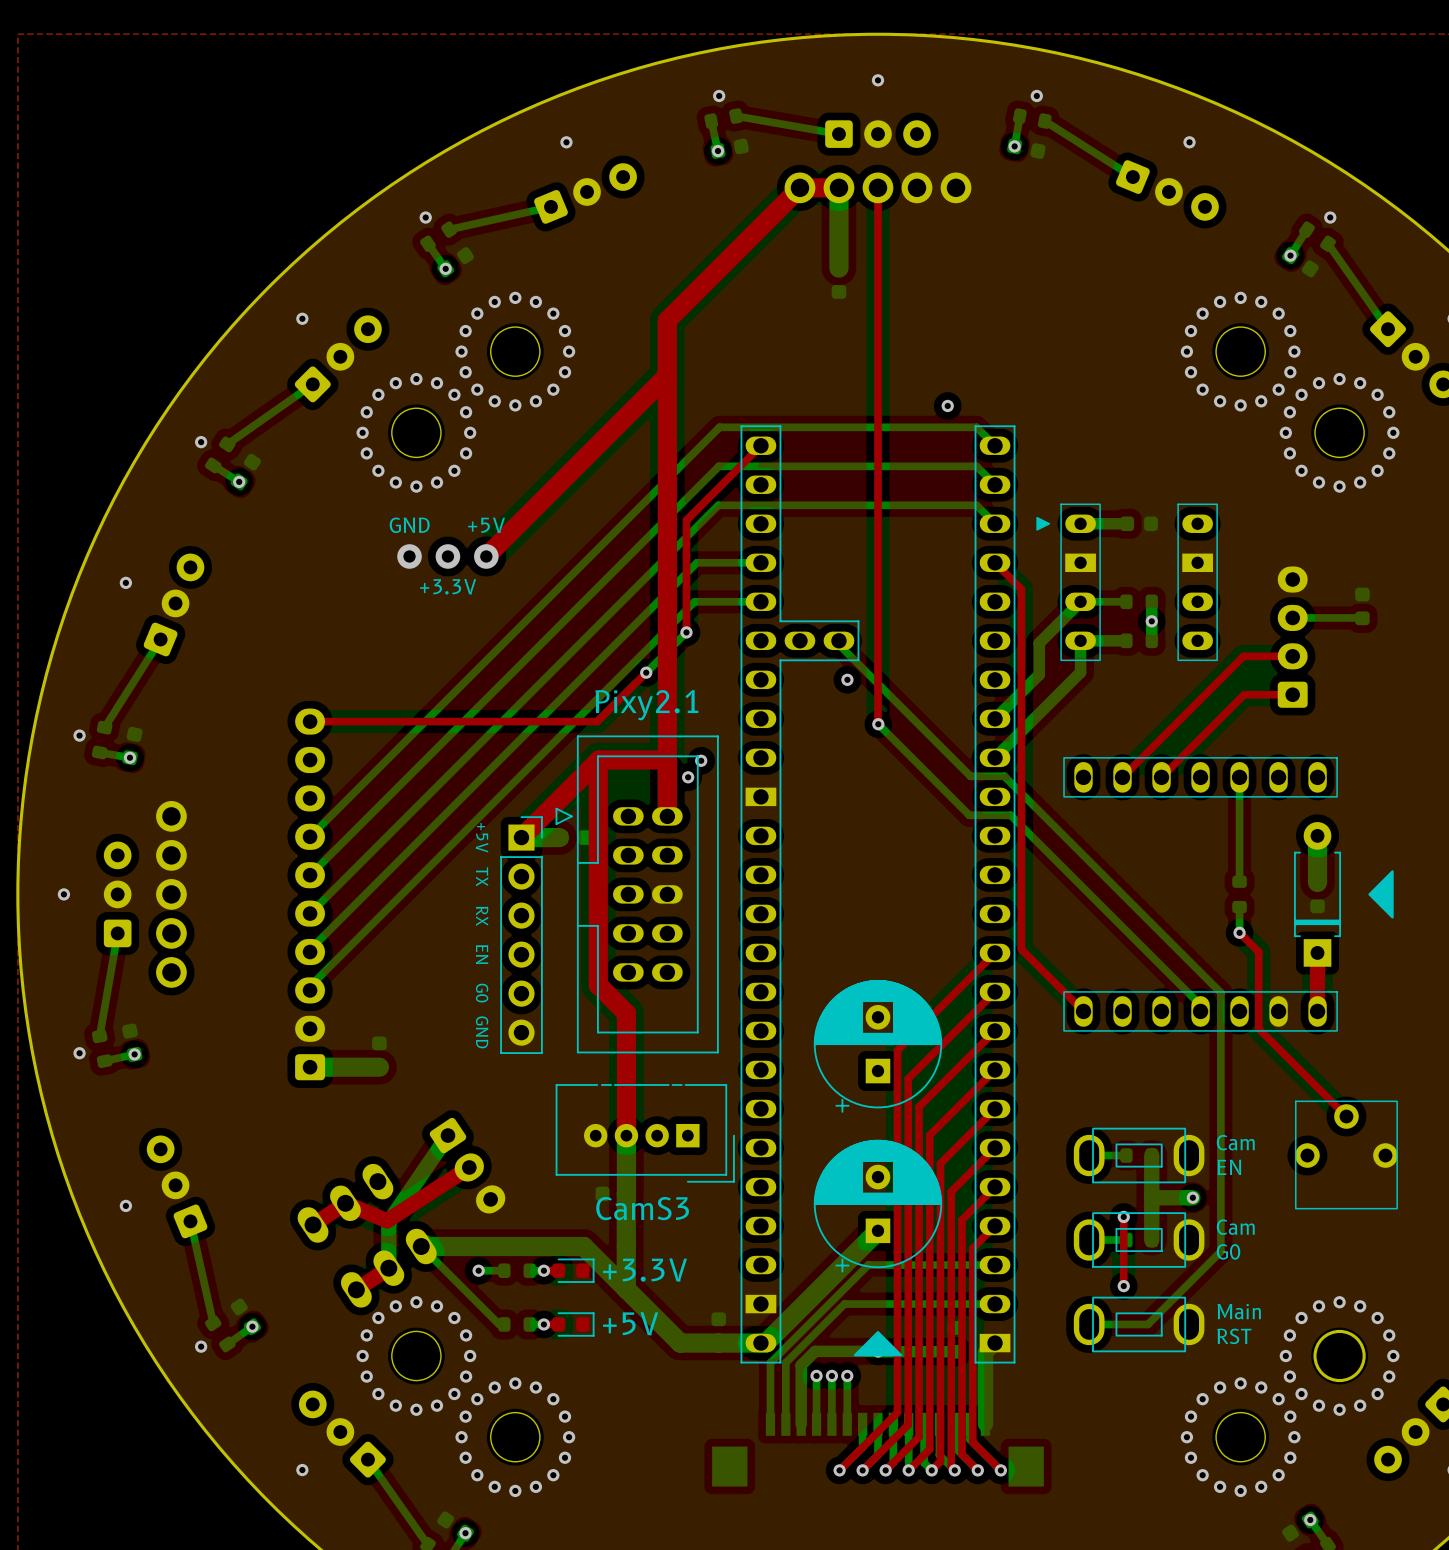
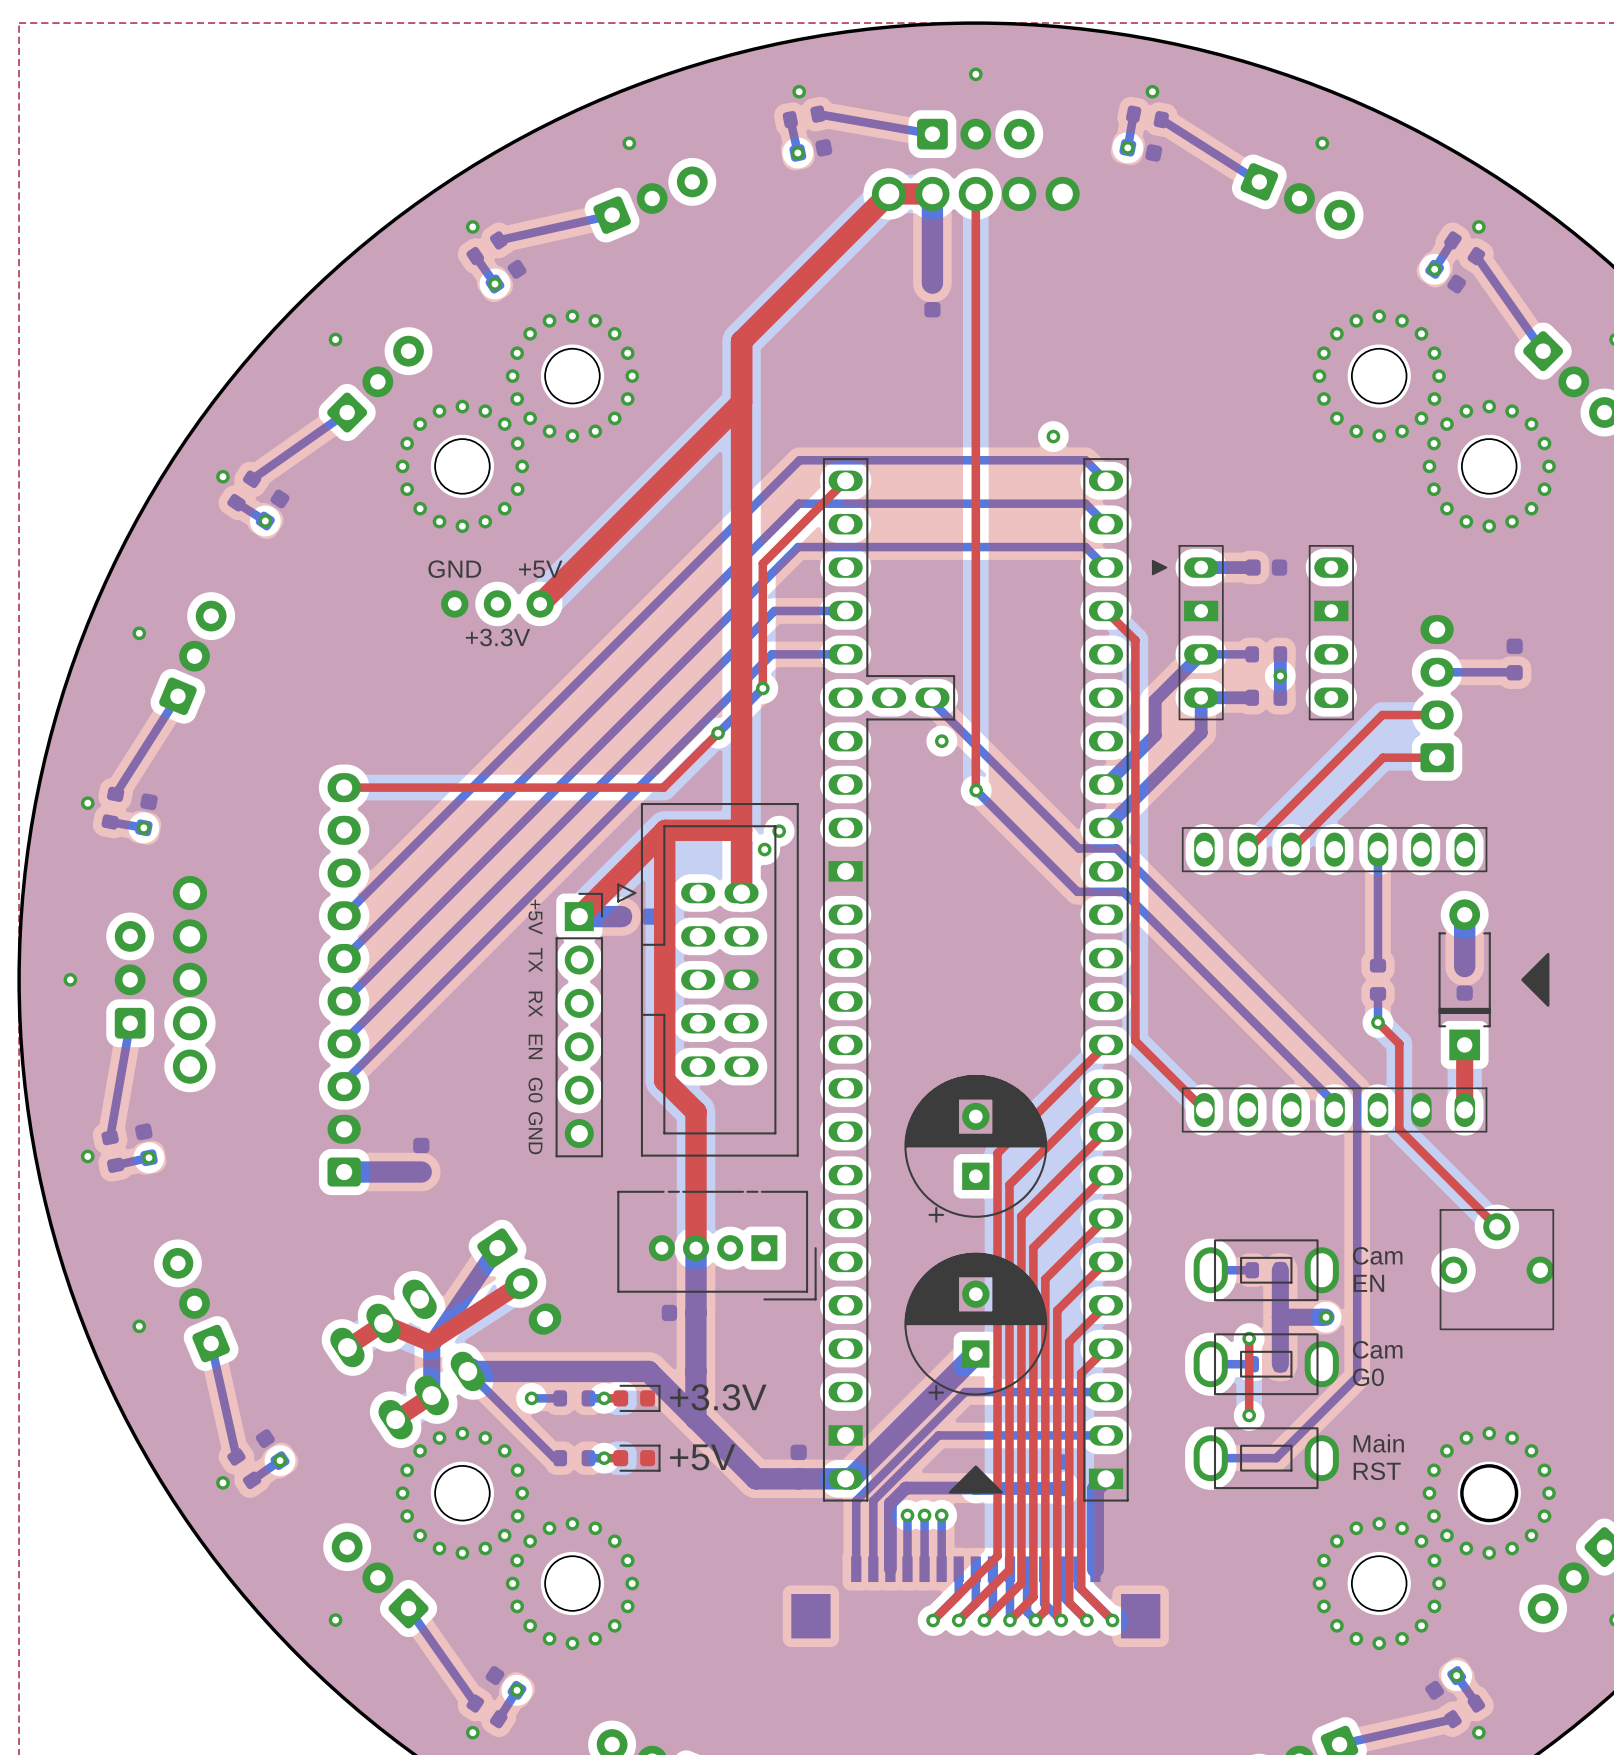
text: Pixy2.1 (646, 705) -> none
text: CamS3 (642, 1208) -> none

